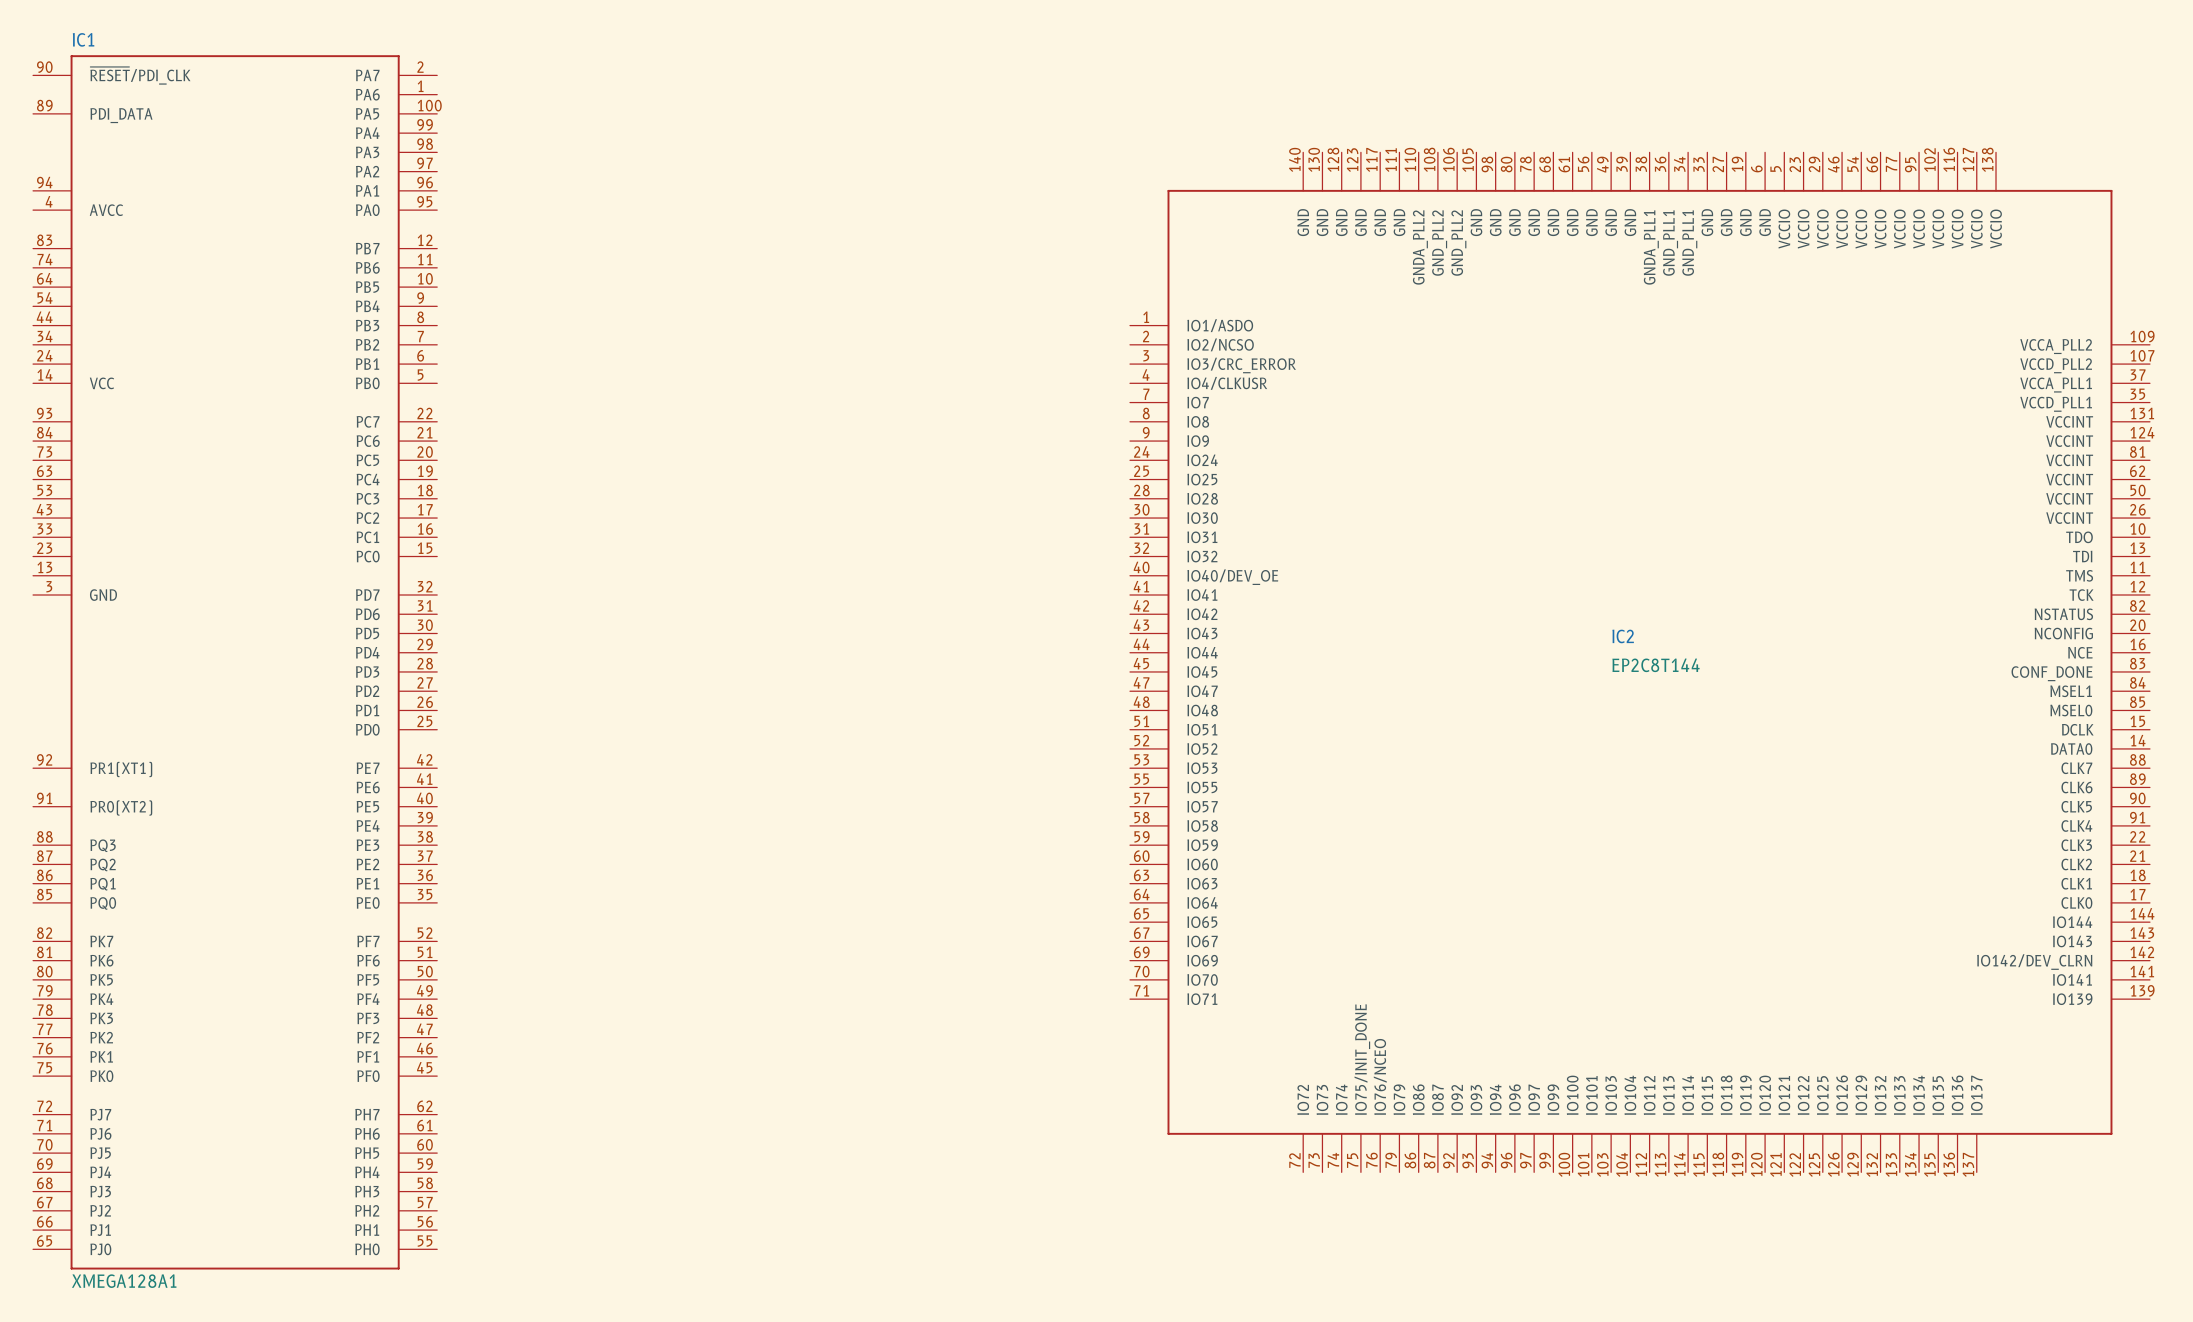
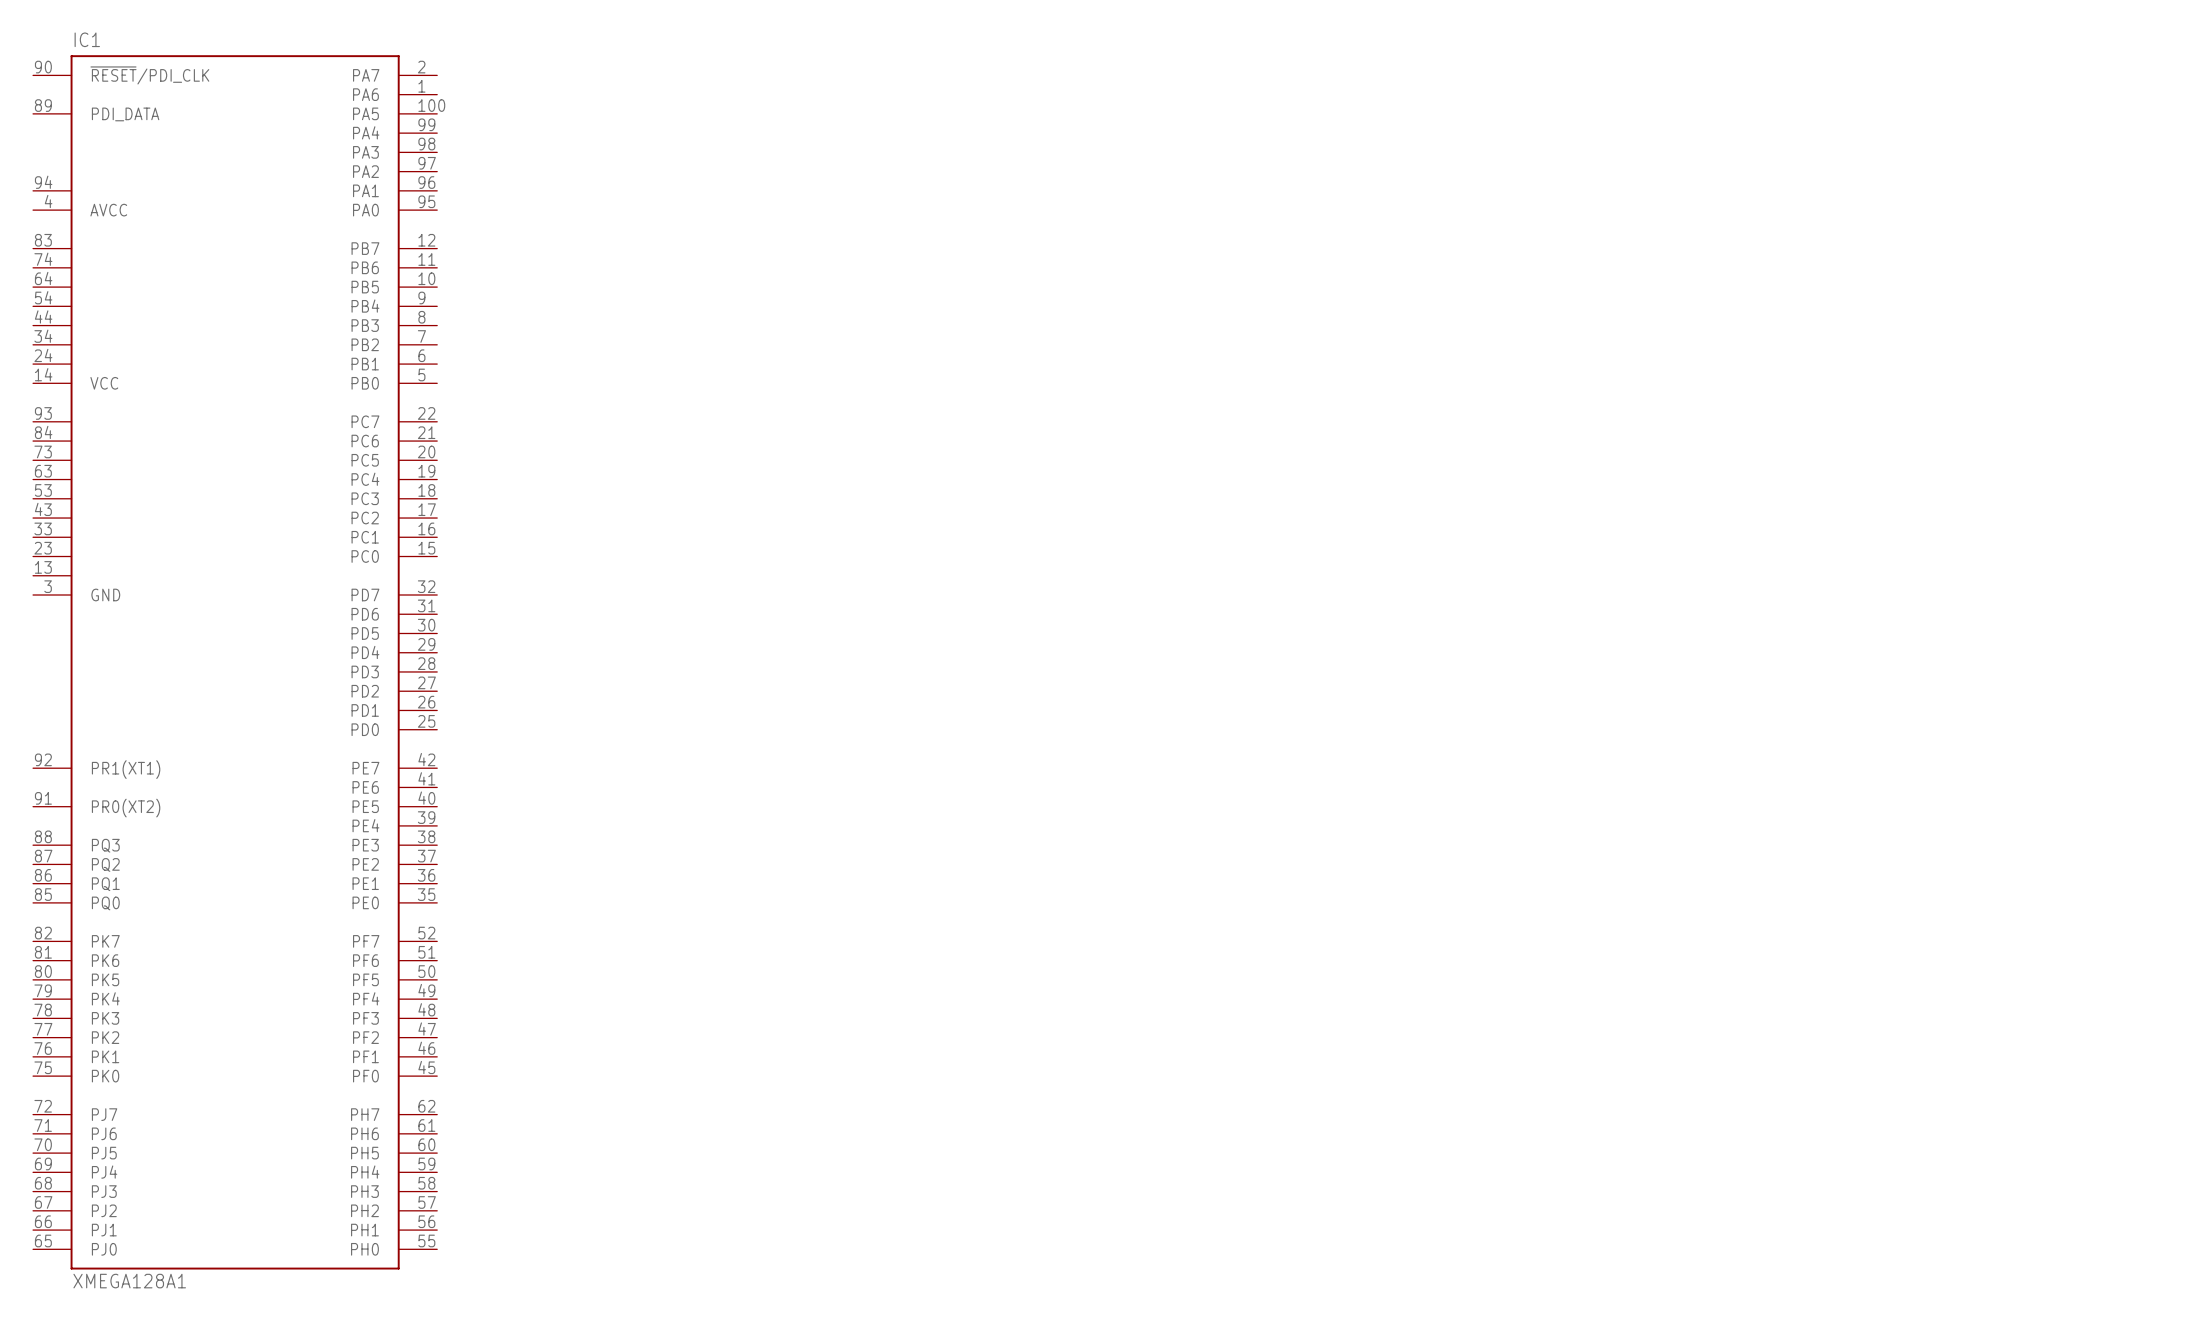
IC2: EP2C8T144 (1639, 662) -> none

